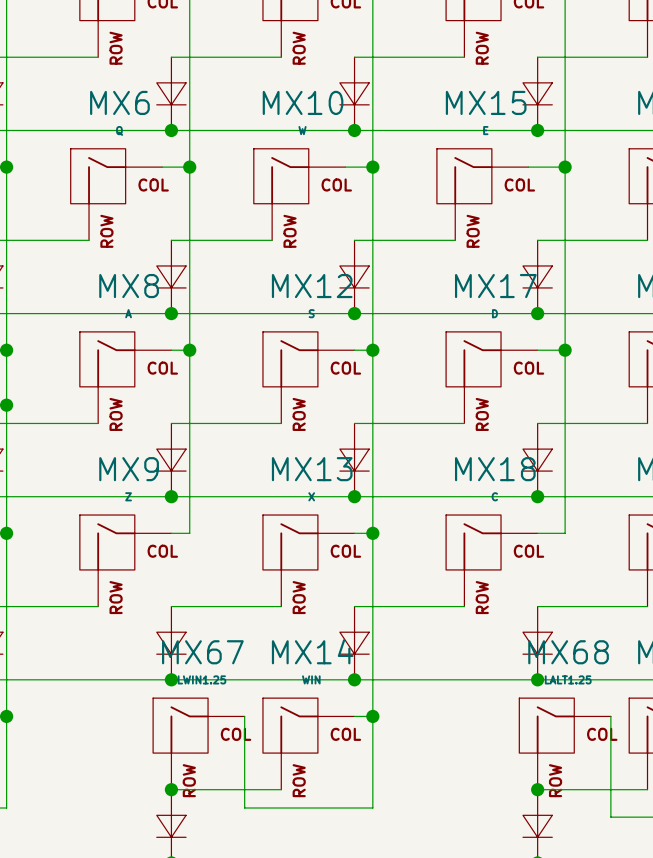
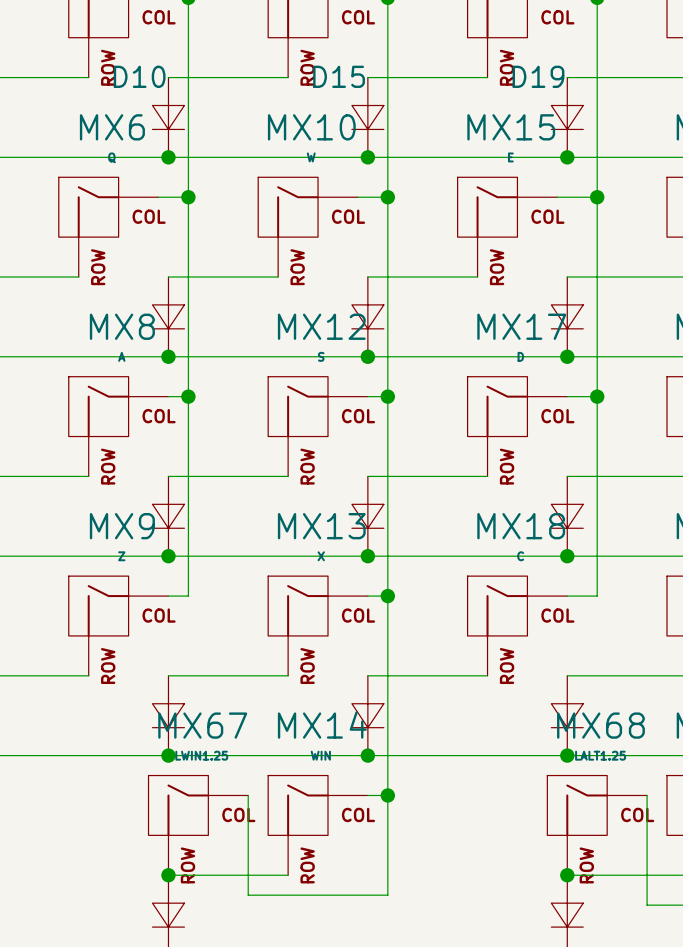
D10 name: none -> D10 (139, 76)
D15 name: none -> D15 (339, 76)
D19 name: none -> D19 (538, 76)

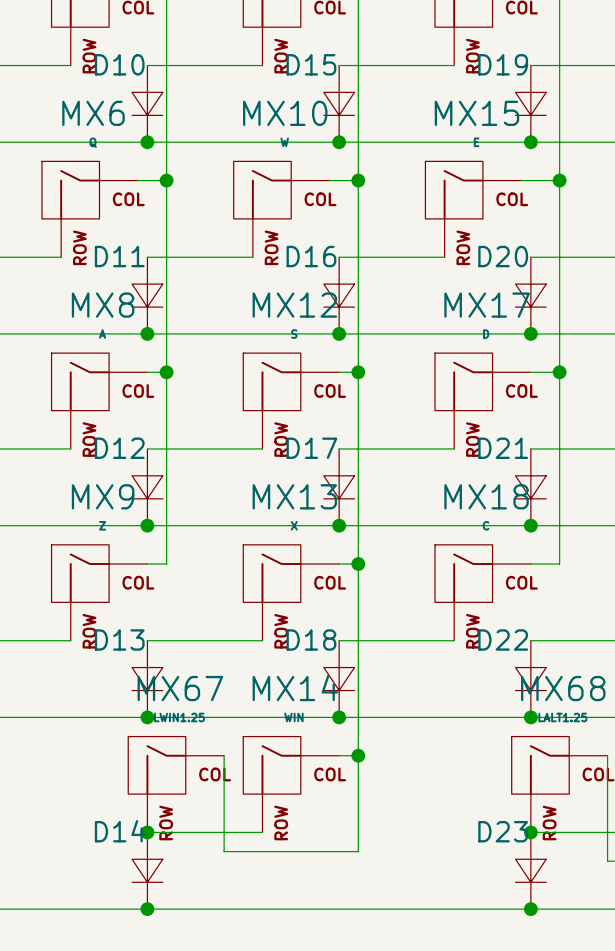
D11 name: none -> D11 (119, 256)
D16 name: none -> D16 (311, 256)
D20 name: none -> D20 (503, 256)
D12 name: none -> D12 (119, 448)
D17 name: none -> D17 (311, 448)
D21 name: none -> D21 (503, 448)
D13 name: none -> D13 (119, 639)
D18 name: none -> D18 (311, 639)
D22 name: none -> D22 (503, 639)
D14 name: none -> D14 (120, 831)
D23 name: none -> D23 (503, 831)

